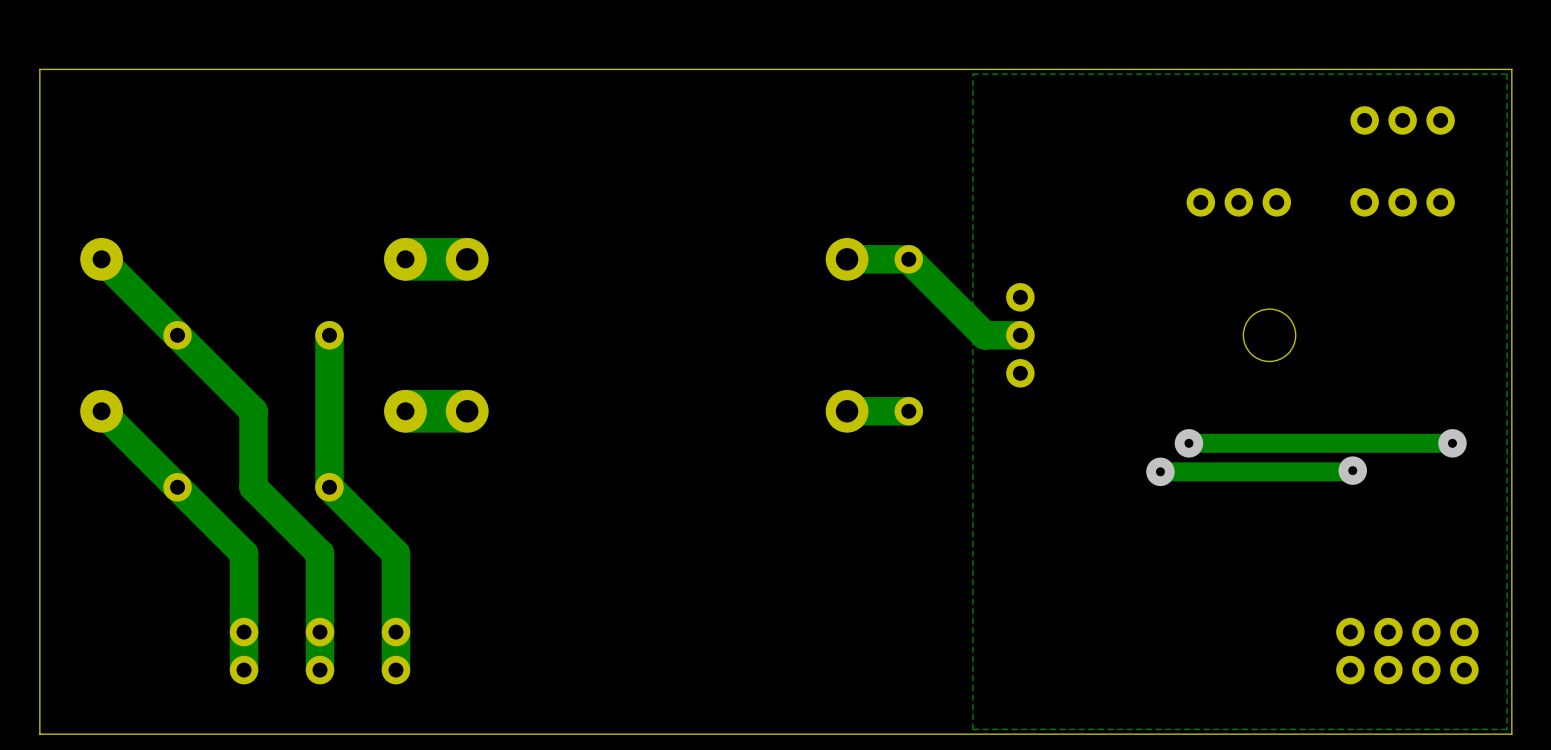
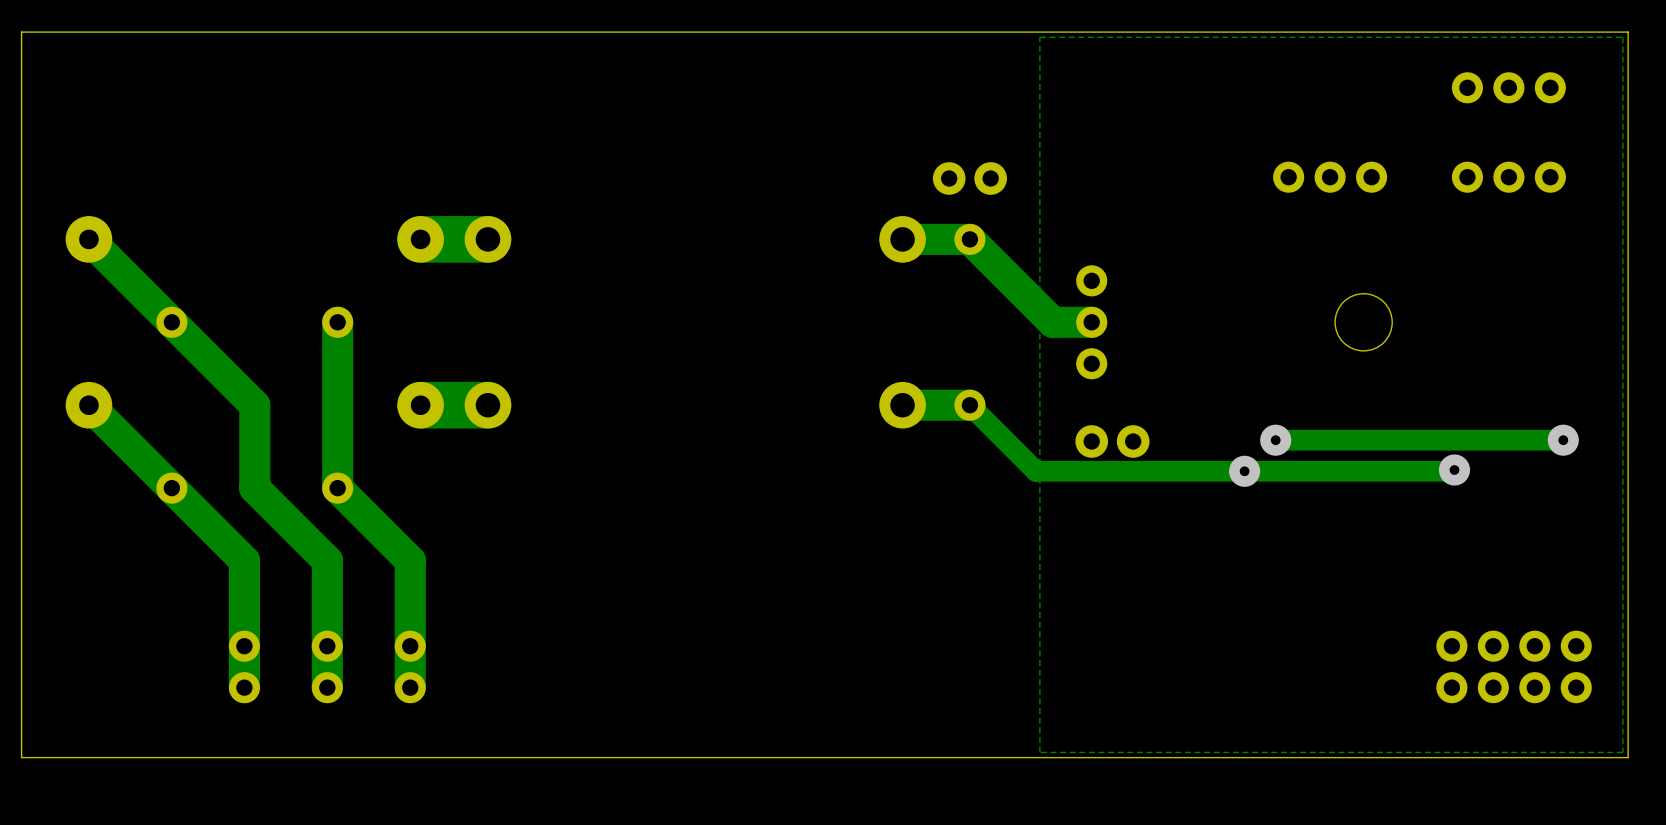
part: none -> (969, 178)
track: none -> (969, 405) (1036, 471) (1244, 471)
part: none -> (1112, 441)

